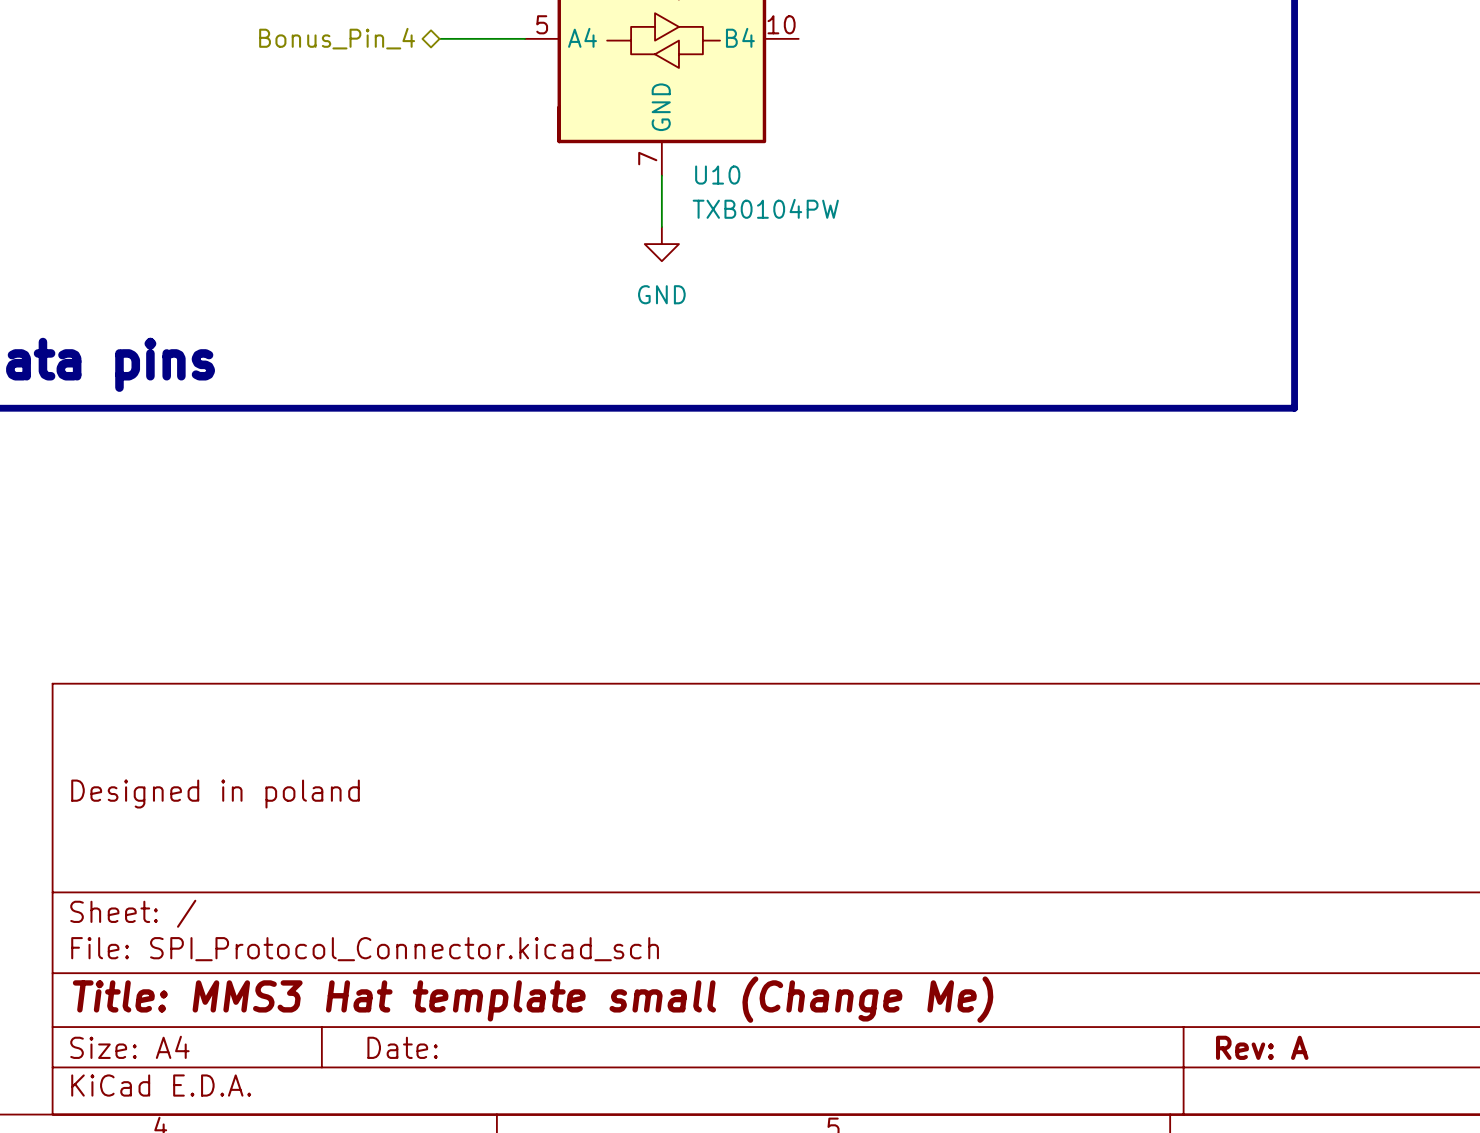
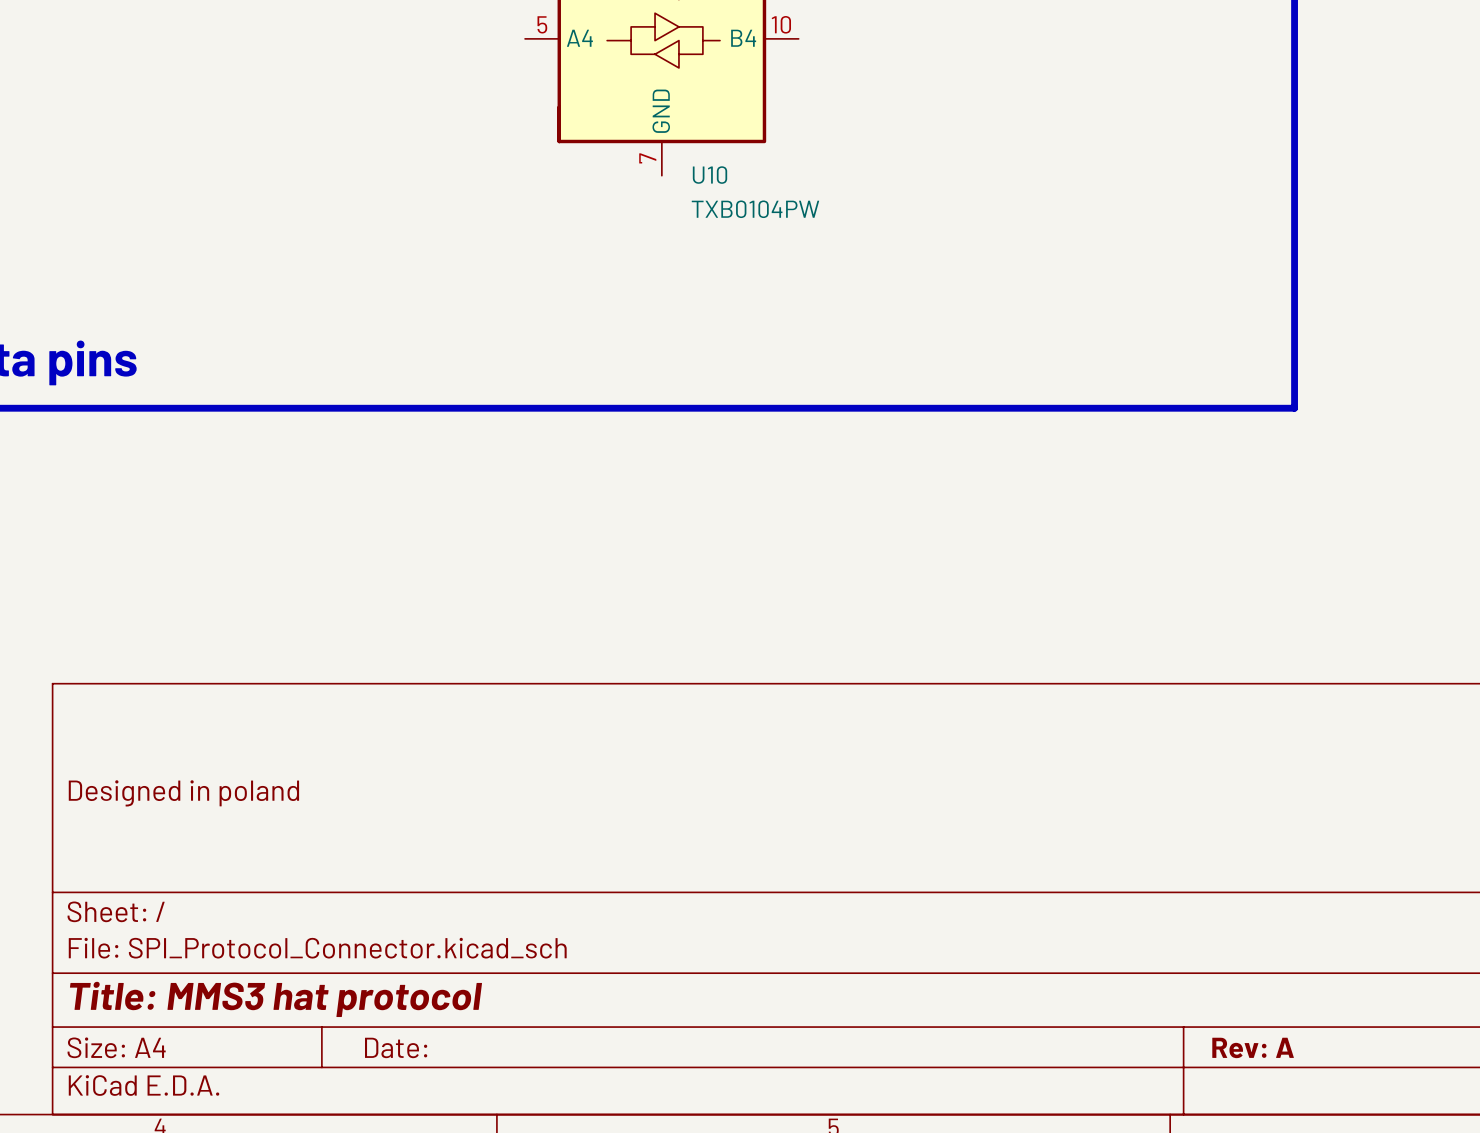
hierarchical label: Bonus_Pin_4 (337, 38) -> none
wire: (439, 38) (525, 38) -> none
wire: (661, 175) (661, 226) -> none
power symbol: GND (661, 244) -> none
title block: Title: MMS3 Hat template small (Change Me) (533, 999) -> Title: MMS3 hat protocol (275, 999)

